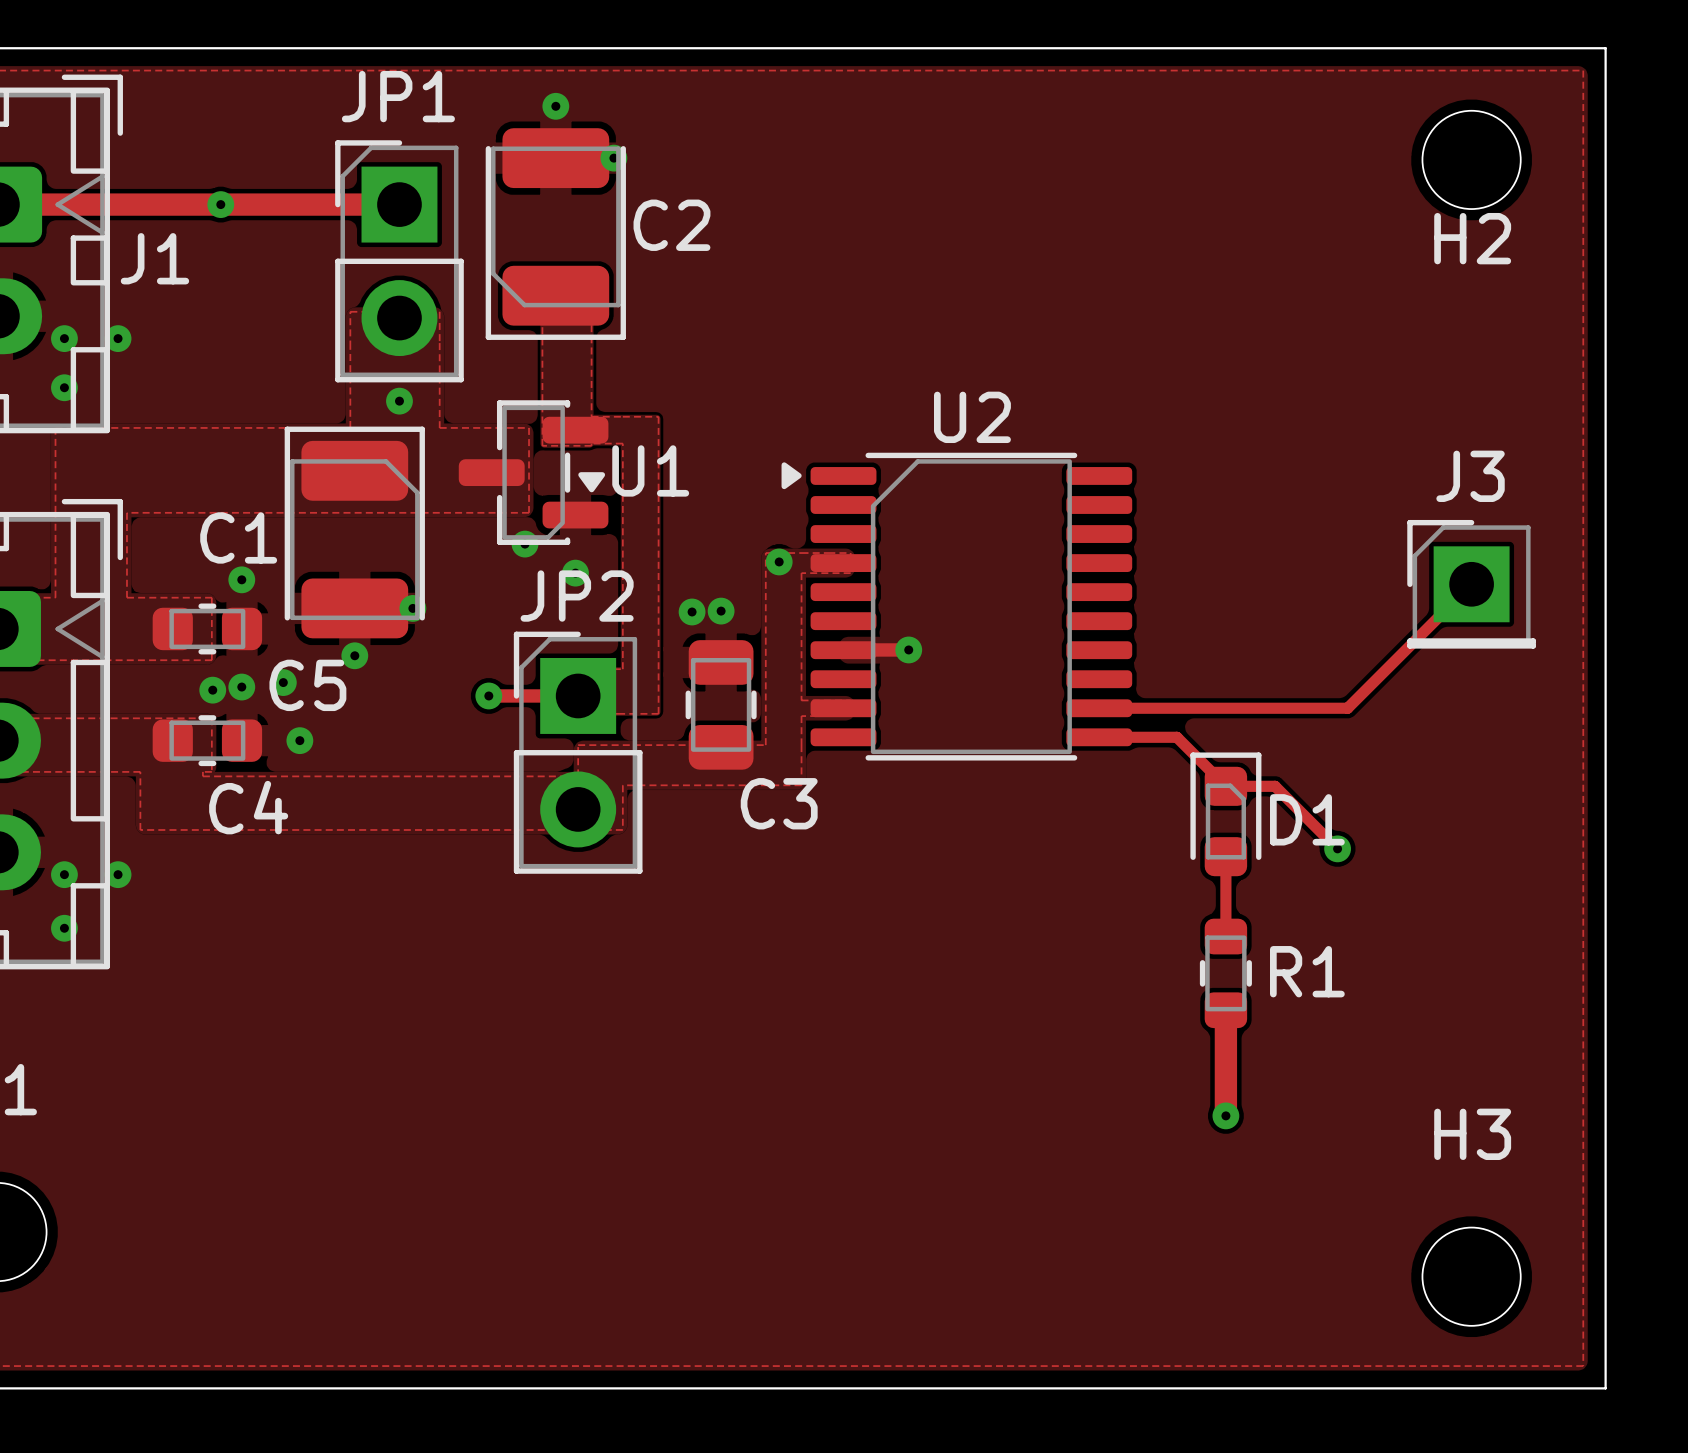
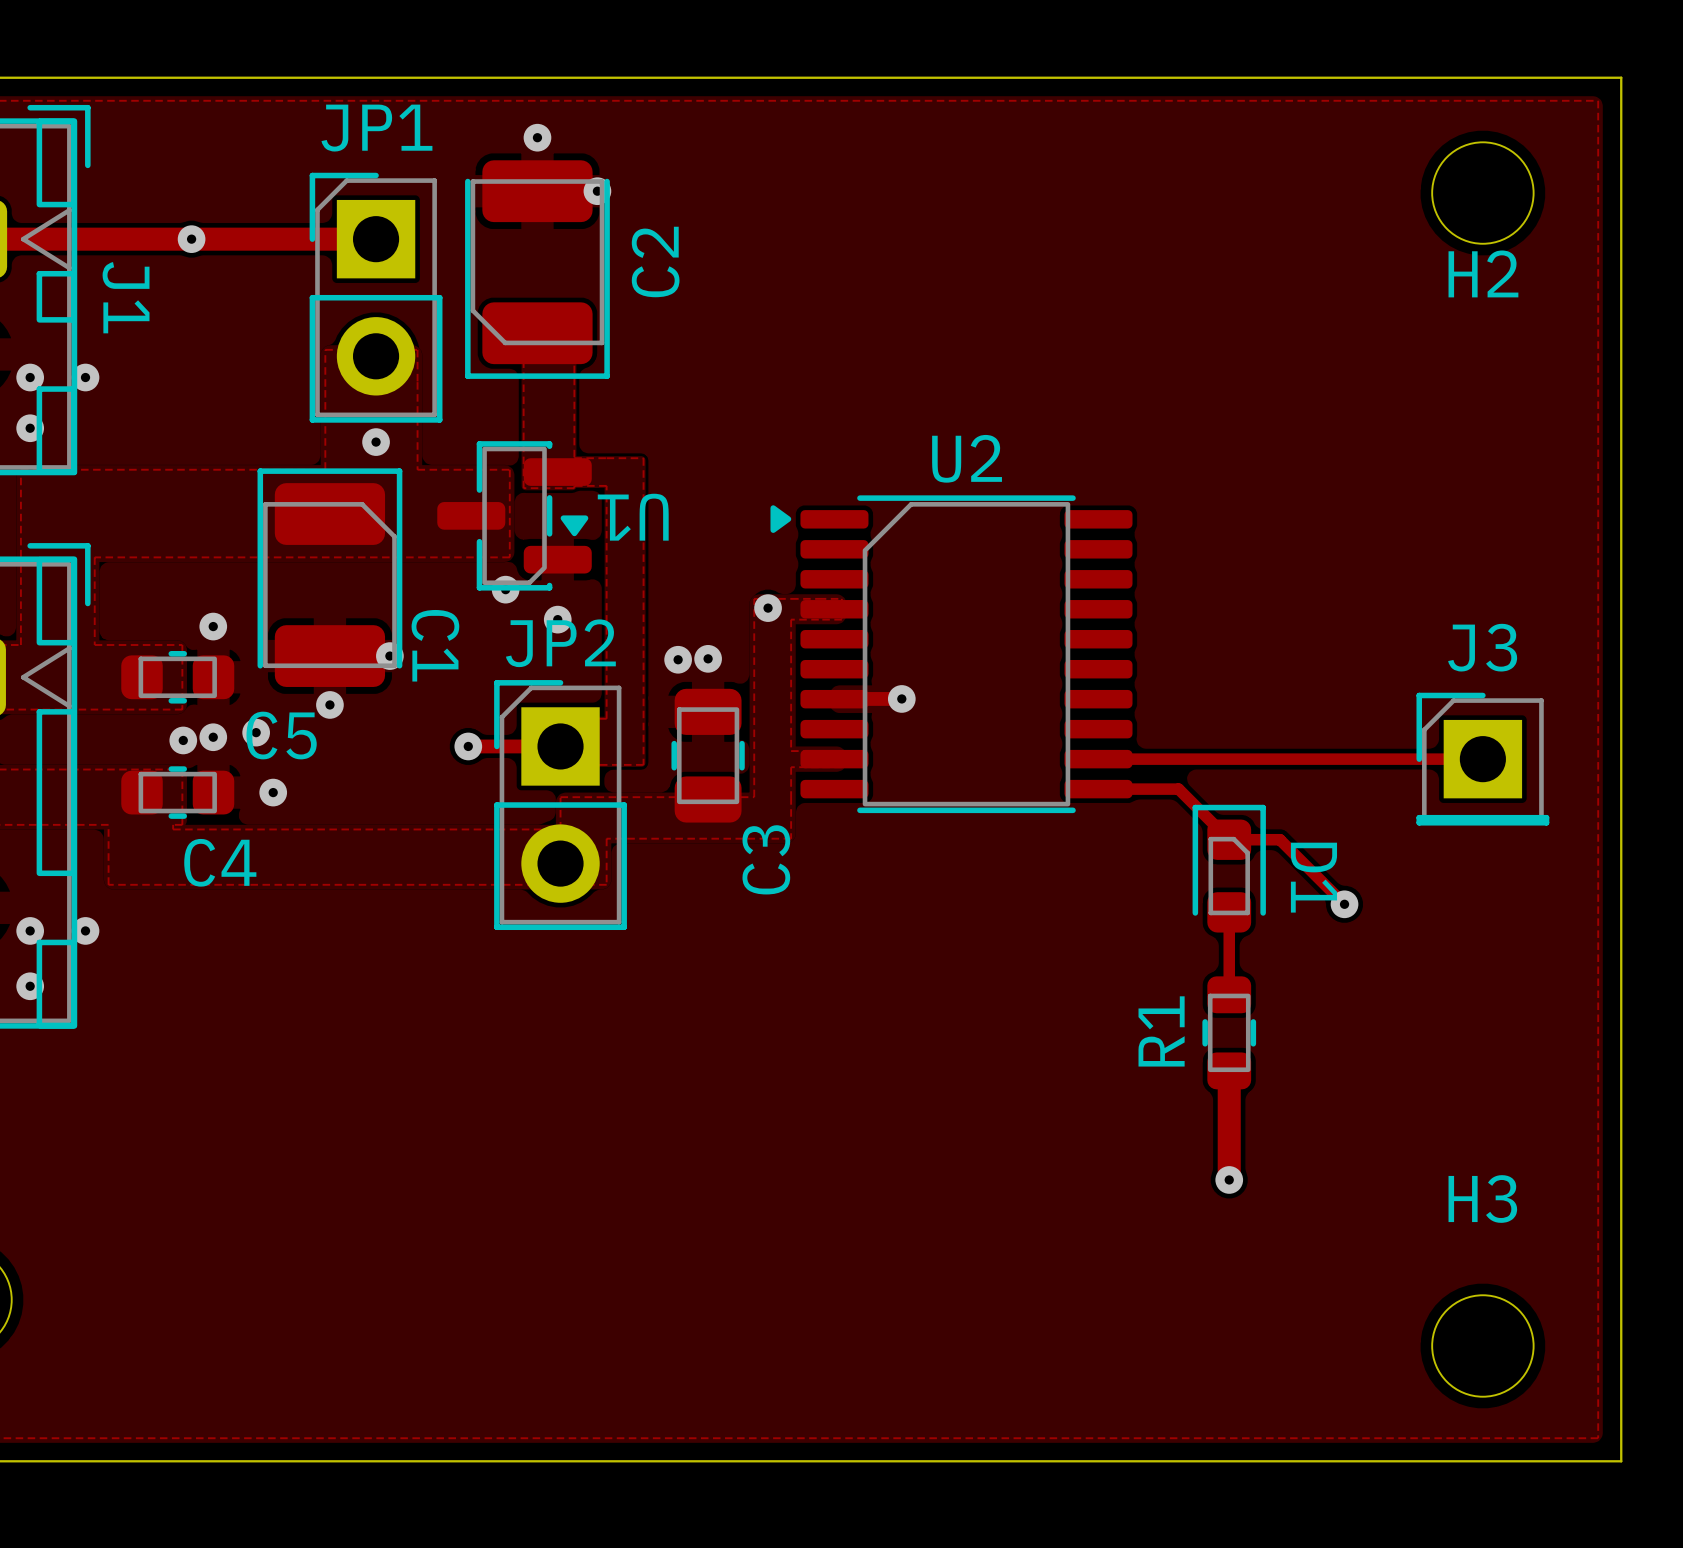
C2 name rotation: 0° (671, 225) -> 90° counterclockwise (655, 261)
J1 name rotation: 0° (154, 258) -> 90° clockwise (126, 297)
U1 name rotation: 0° (650, 470) -> 180° (633, 517)
C1 name rotation: 0° (238, 537) -> 90° clockwise (435, 645)
C1 name position: C1 (238, 537) -> C1 (435, 645)
track: (1471, 584) (1347, 708) -> (1482, 759) (1354, 759)
J3 position: (1471, 584) -> (1482, 759)
C3 name rotation: 0° (779, 803) -> 90° counterclockwise (766, 859)
D1 name rotation: 0° (1307, 819) -> 90° clockwise (1313, 877)
R1 name rotation: 0° (1307, 971) -> 90° counterclockwise (1161, 1031)
R1 name position: R1 (1307, 971) -> R1 (1161, 1031)

